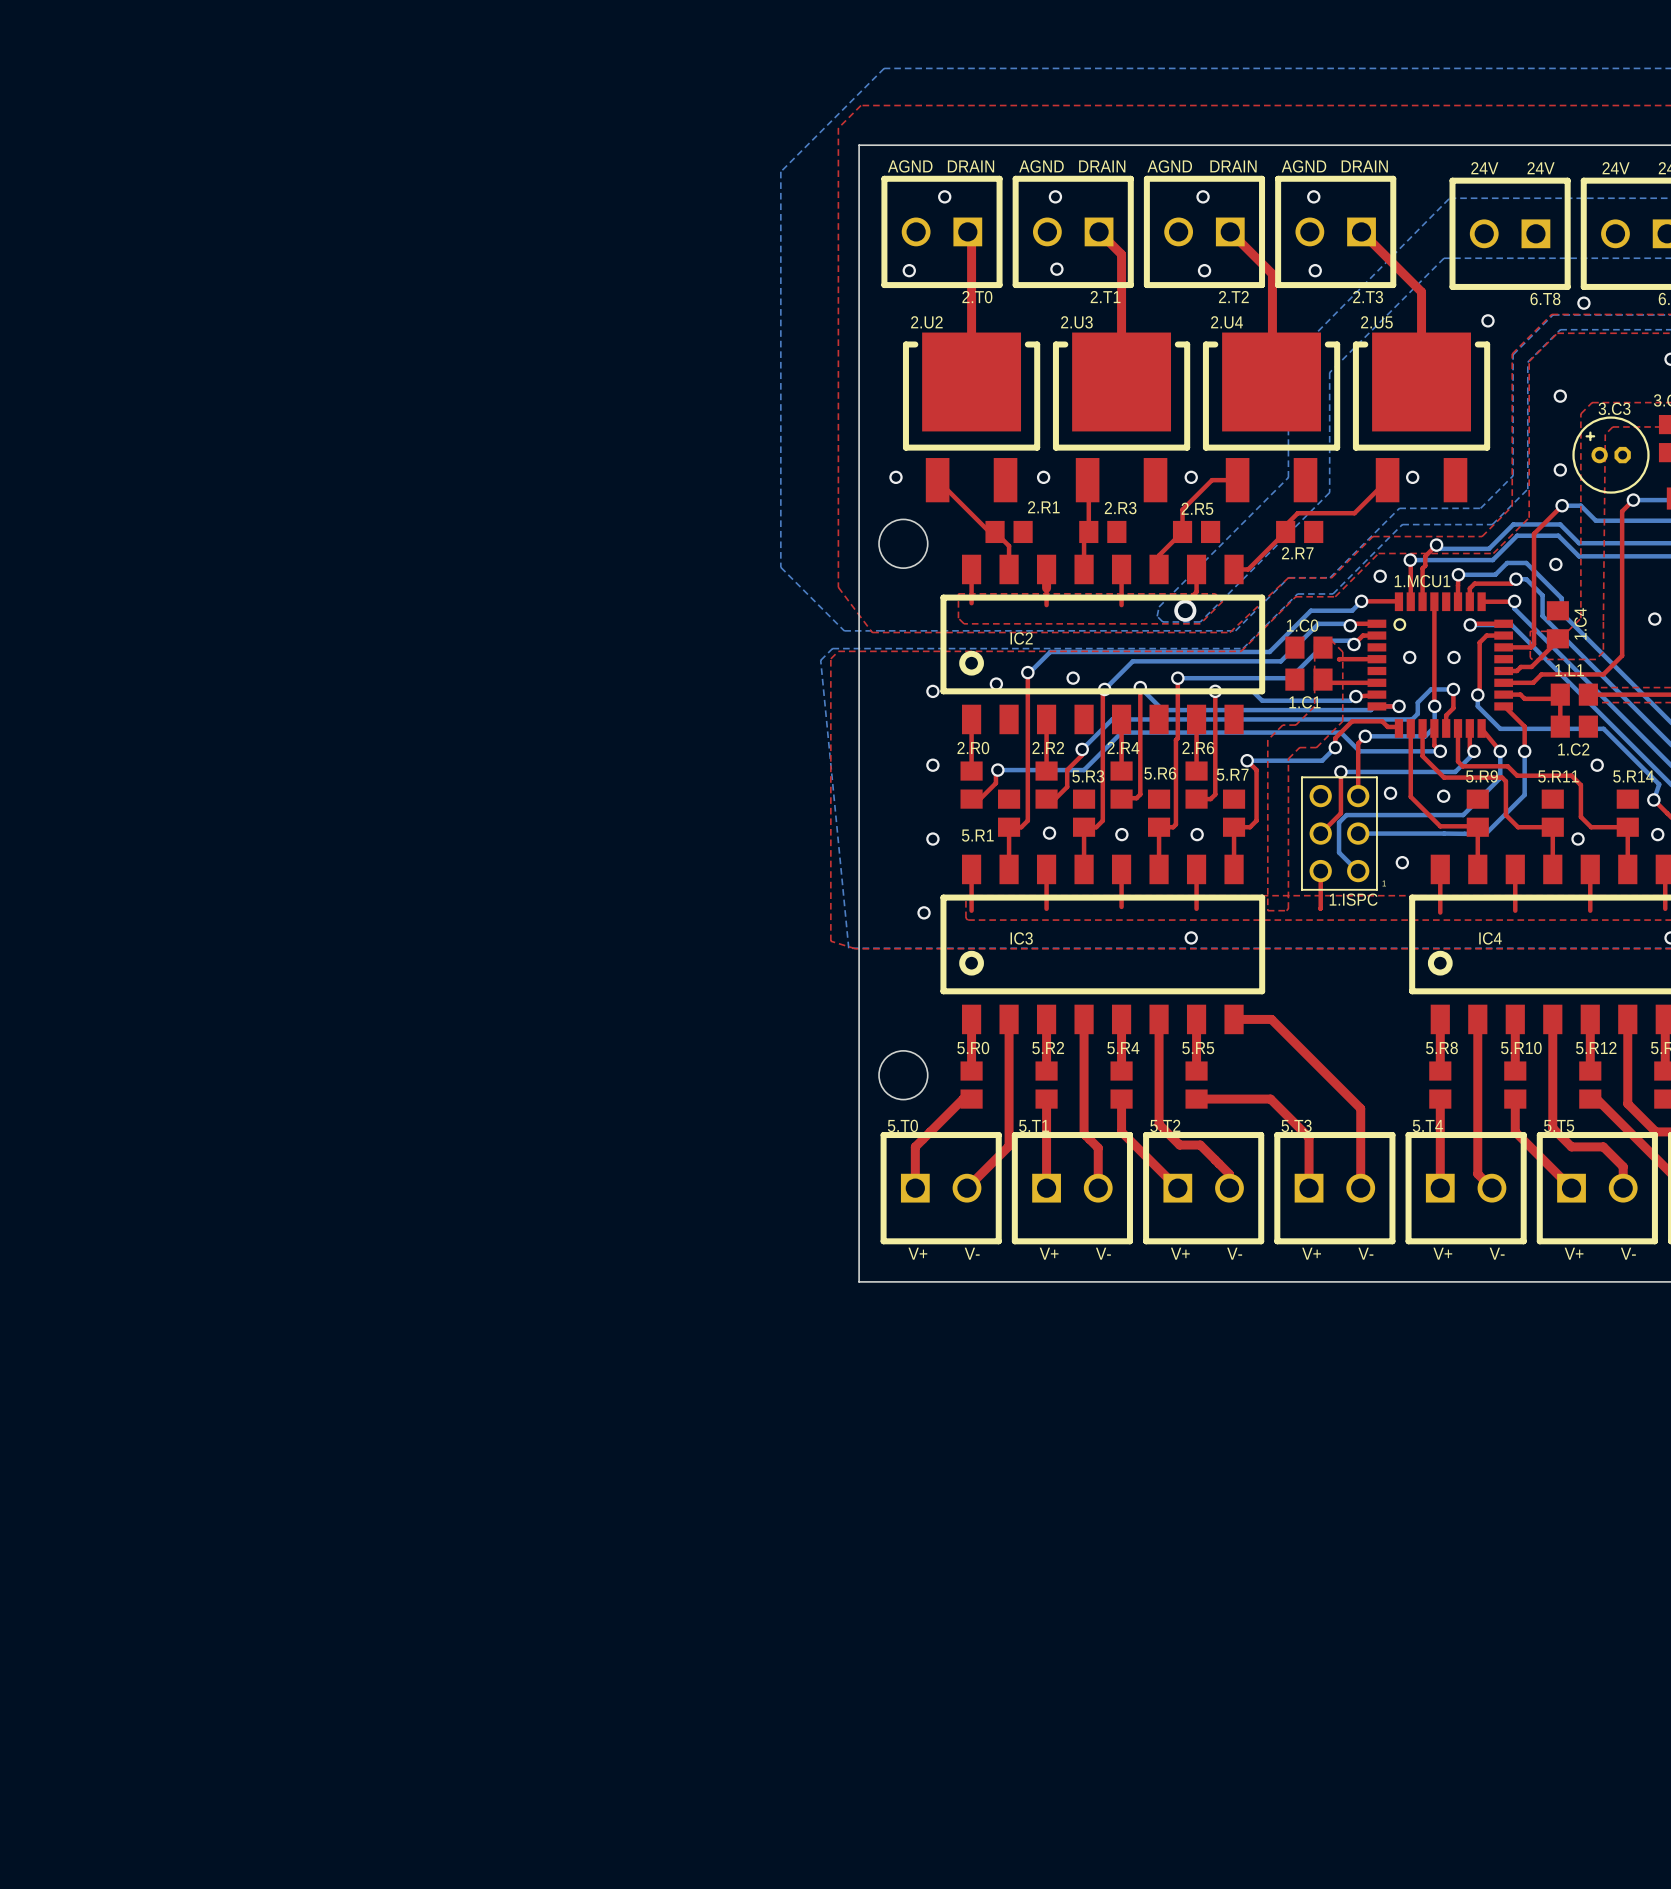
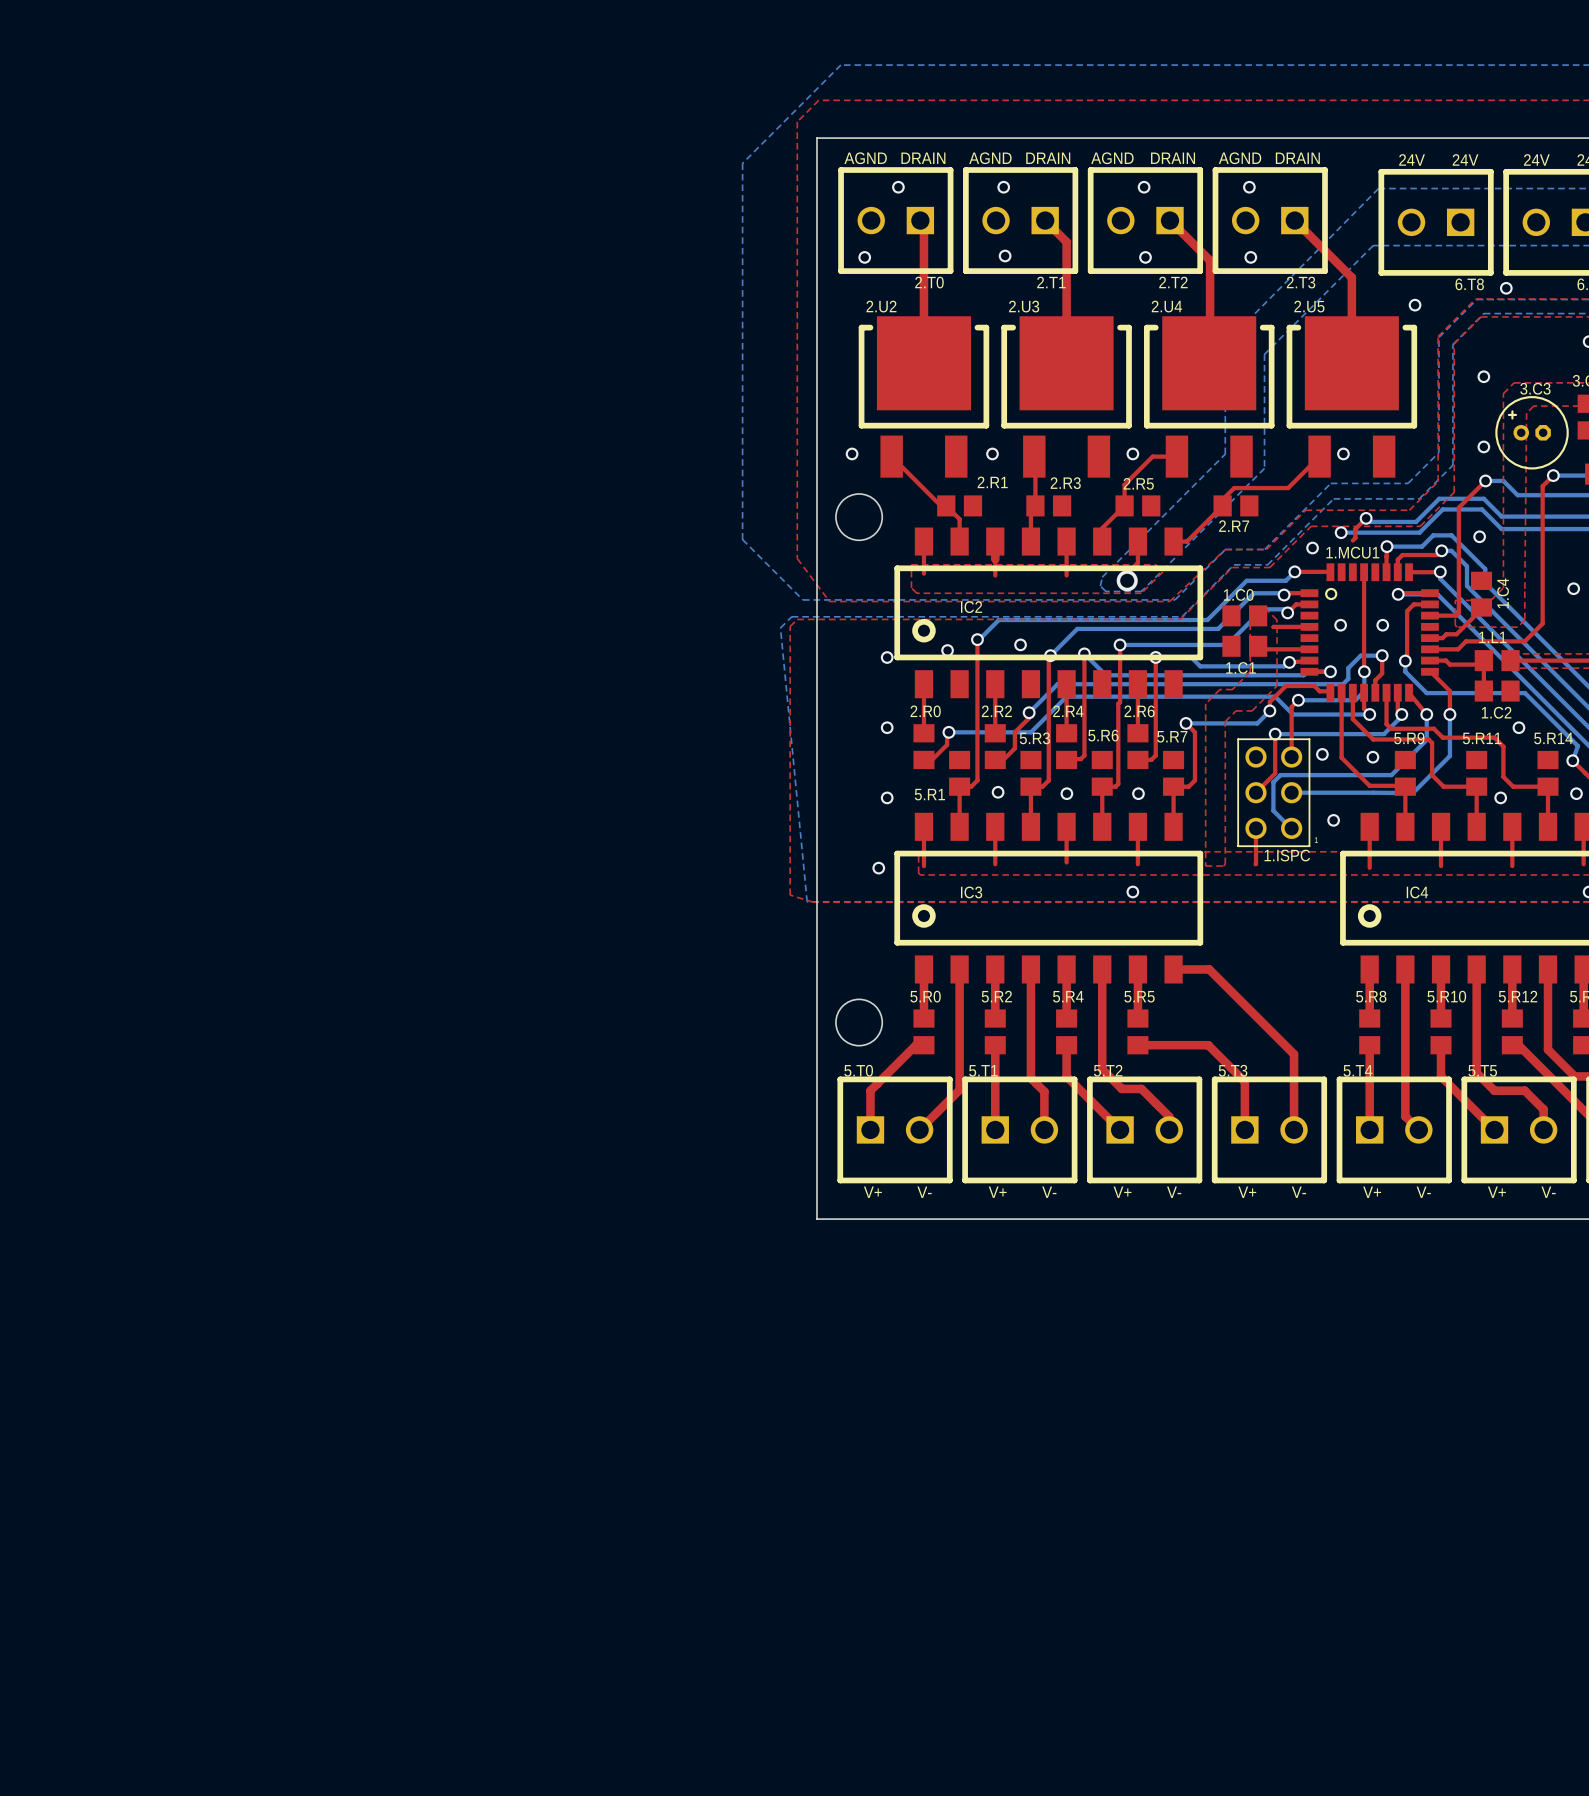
top track: (1410, 560) (1410, 601) -> none
top track: (1422, 568) (1422, 601) -> none

